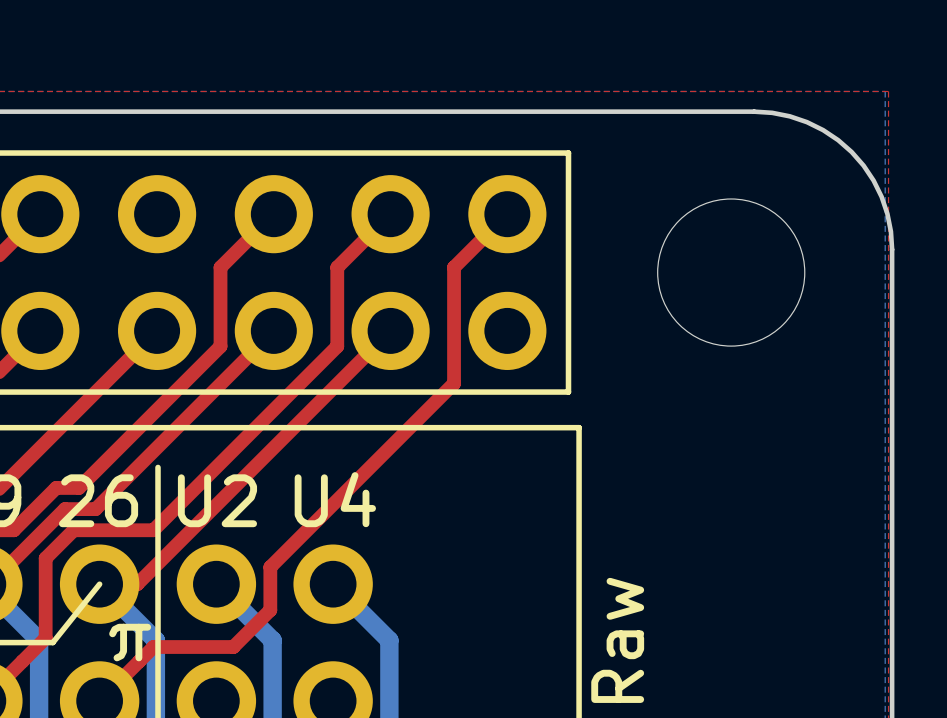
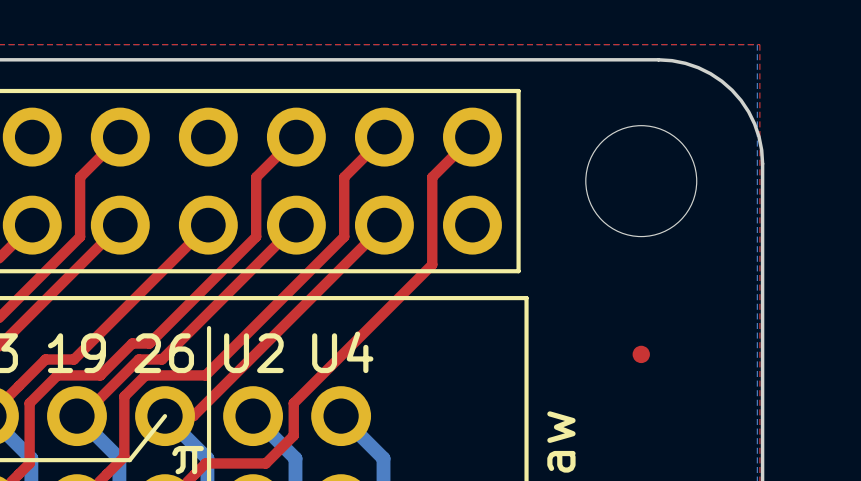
part: none -> (641, 354)

